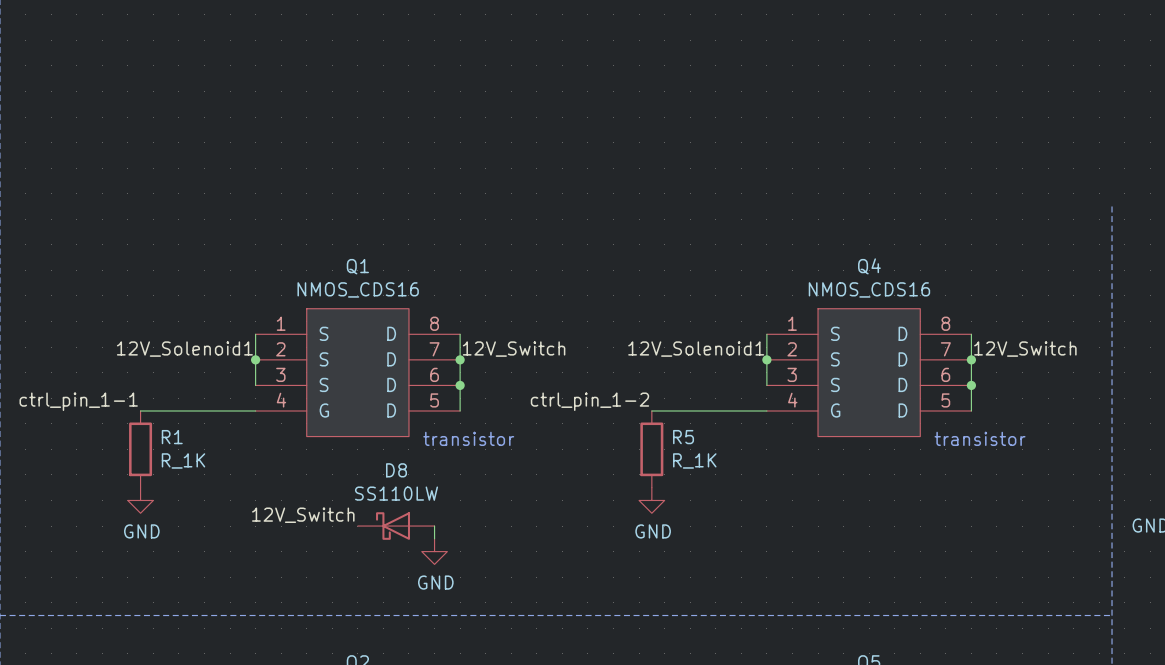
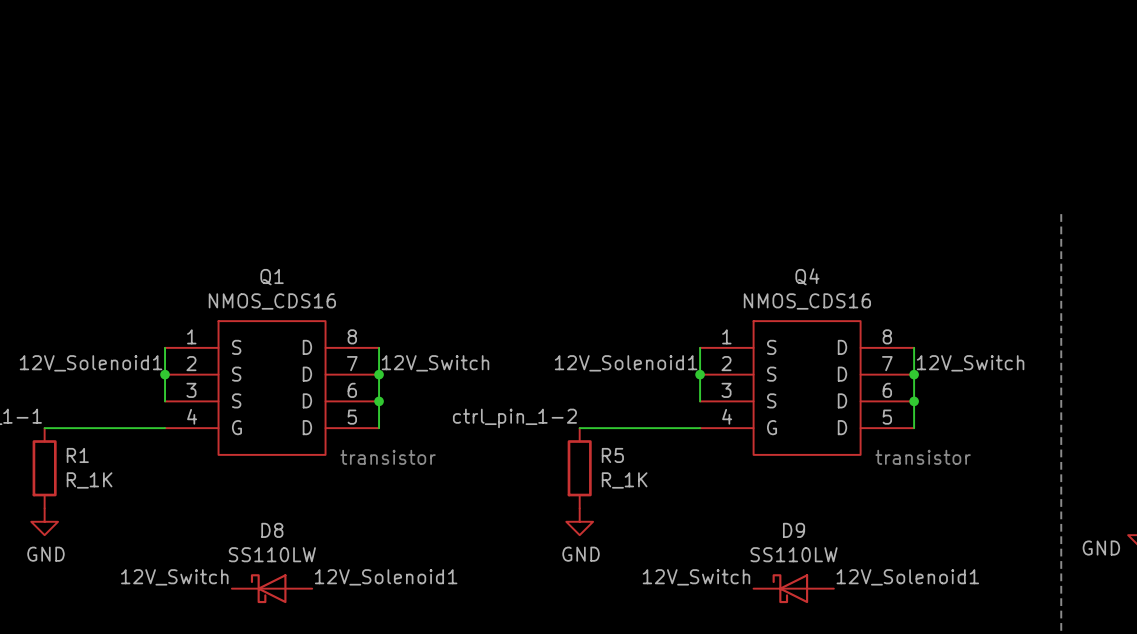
label position: 12V_Switch (303, 515) -> 12V_Switch (174, 577)
D8 position: (396, 526) -> (272, 588)
wire: (434, 526) (434, 538) -> none
power symbol: GND (434, 551) -> none
label: none -> 12V_Solenoid1 (386, 577)
label: none -> 12V_Switch (696, 577)
label: none -> 12V_Solenoid1 (907, 577)
D9: none -> SS110LW (793, 588)

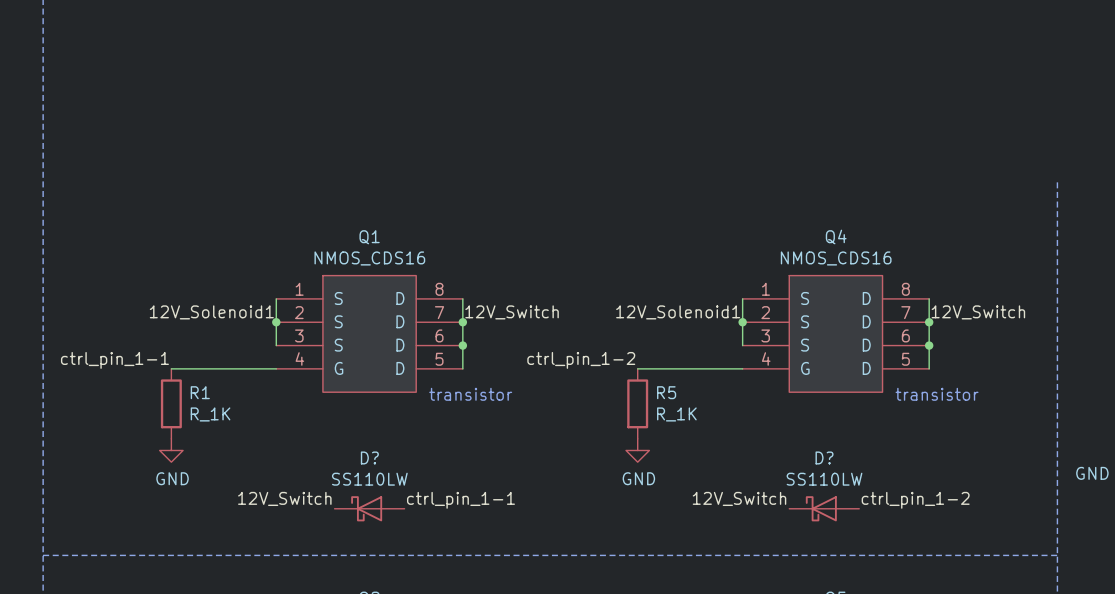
D8 name: D8 (272, 530) -> D? (369, 457)
D9 name: D9 (794, 530) -> D? (824, 457)
label: 12V_Solenoid1 (386, 577) -> ctrl_pin_1-1 (460, 500)
label: 12V_Solenoid1 (907, 577) -> ctrl_pin_1-2 (915, 500)

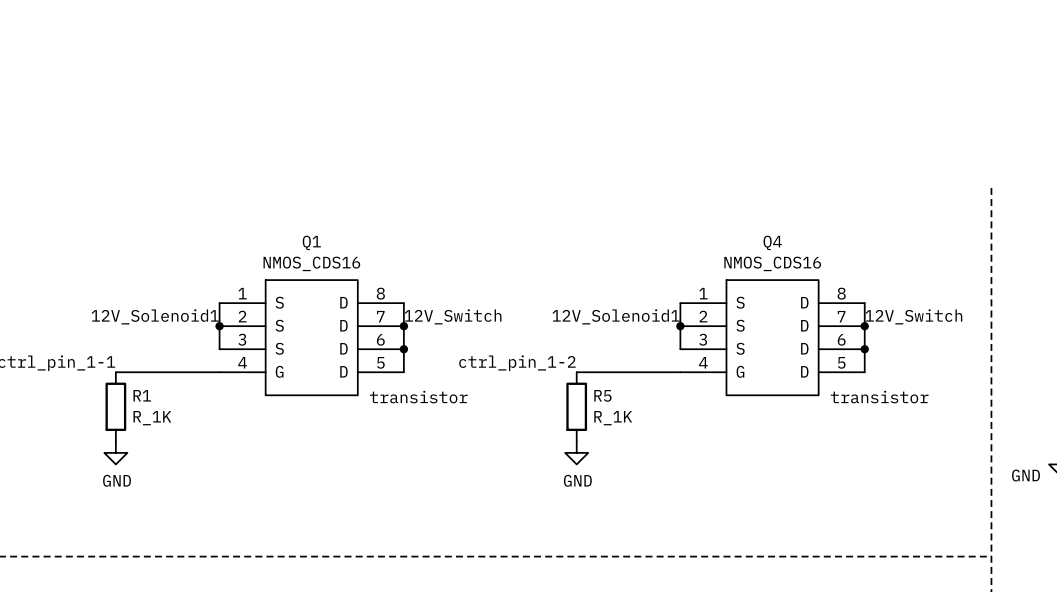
label: 12V_Switch (284, 498) -> none
label: 12V_Switch (739, 498) -> none
label: ctrl_pin_1-1 (460, 500) -> none
label: ctrl_pin_1-2 (915, 500) -> none
D?: SS110LW (369, 508) -> none
D?: SS110LW (824, 508) -> none

